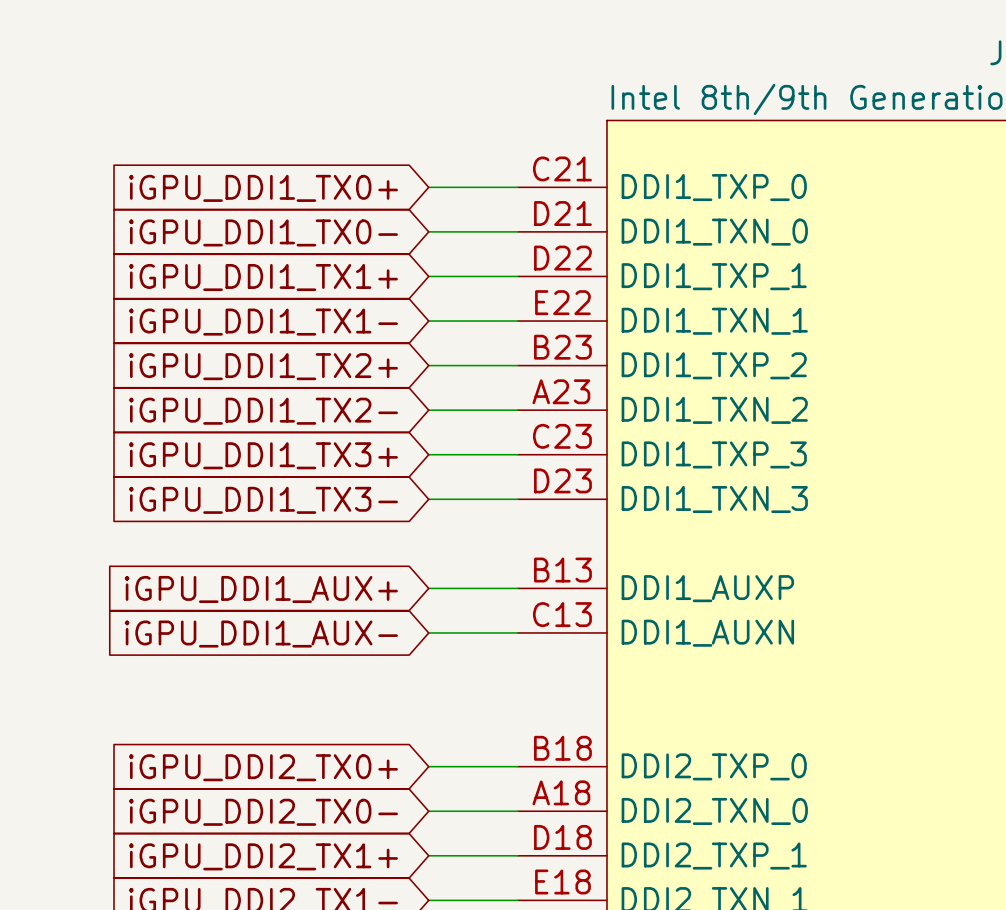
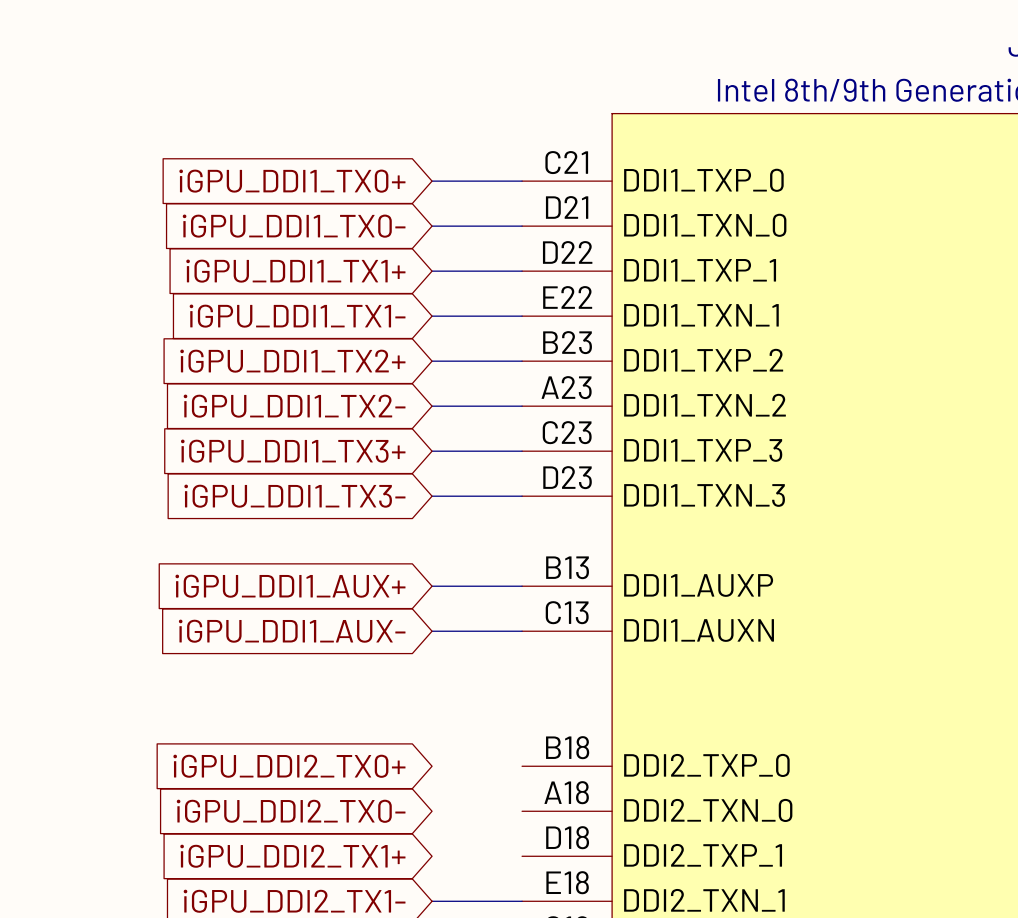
wire: (428, 766) (517, 766) -> none
wire: (428, 811) (517, 811) -> none
wire: (428, 855) (517, 855) -> none

